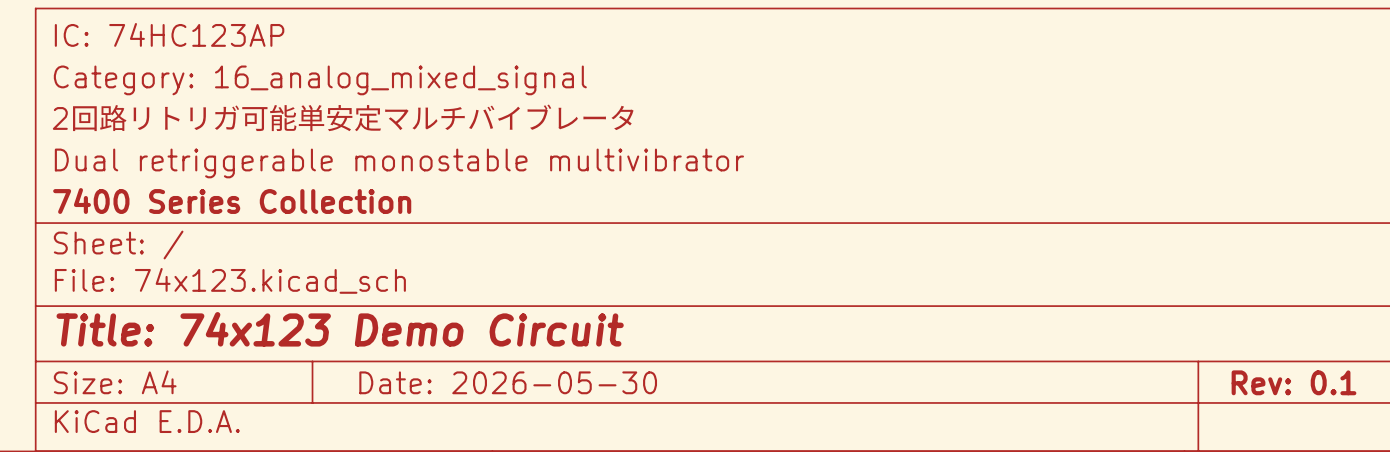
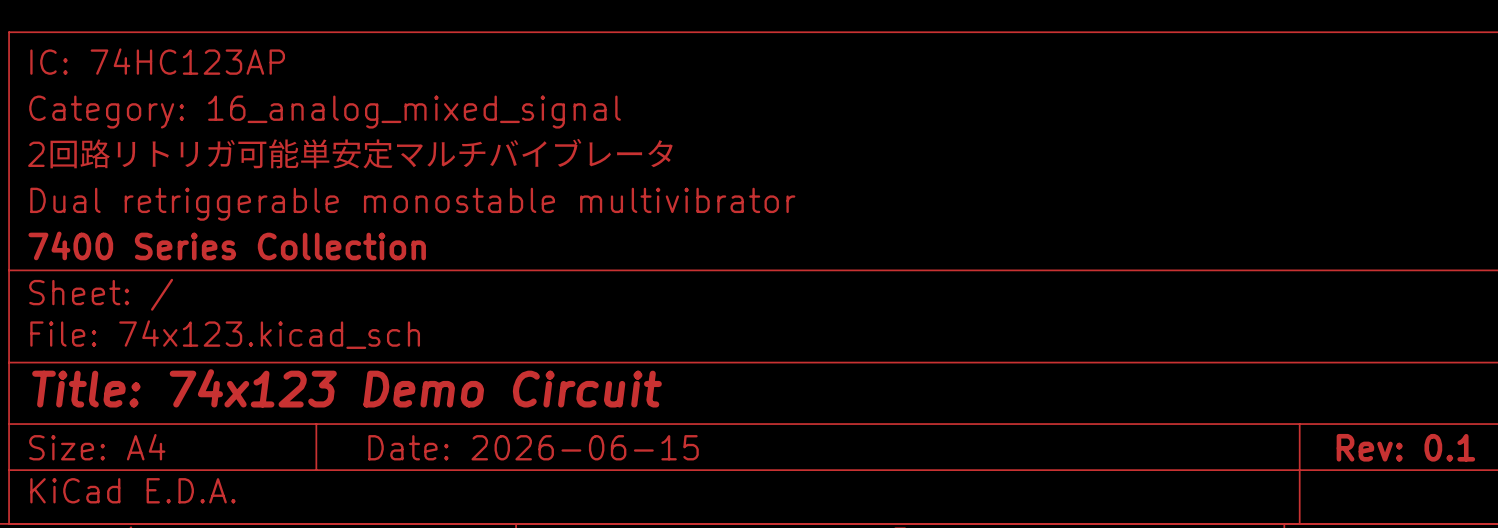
title block: Date: 2026-05-30 (508, 382) -> Date: 2026-06-15 (533, 447)

